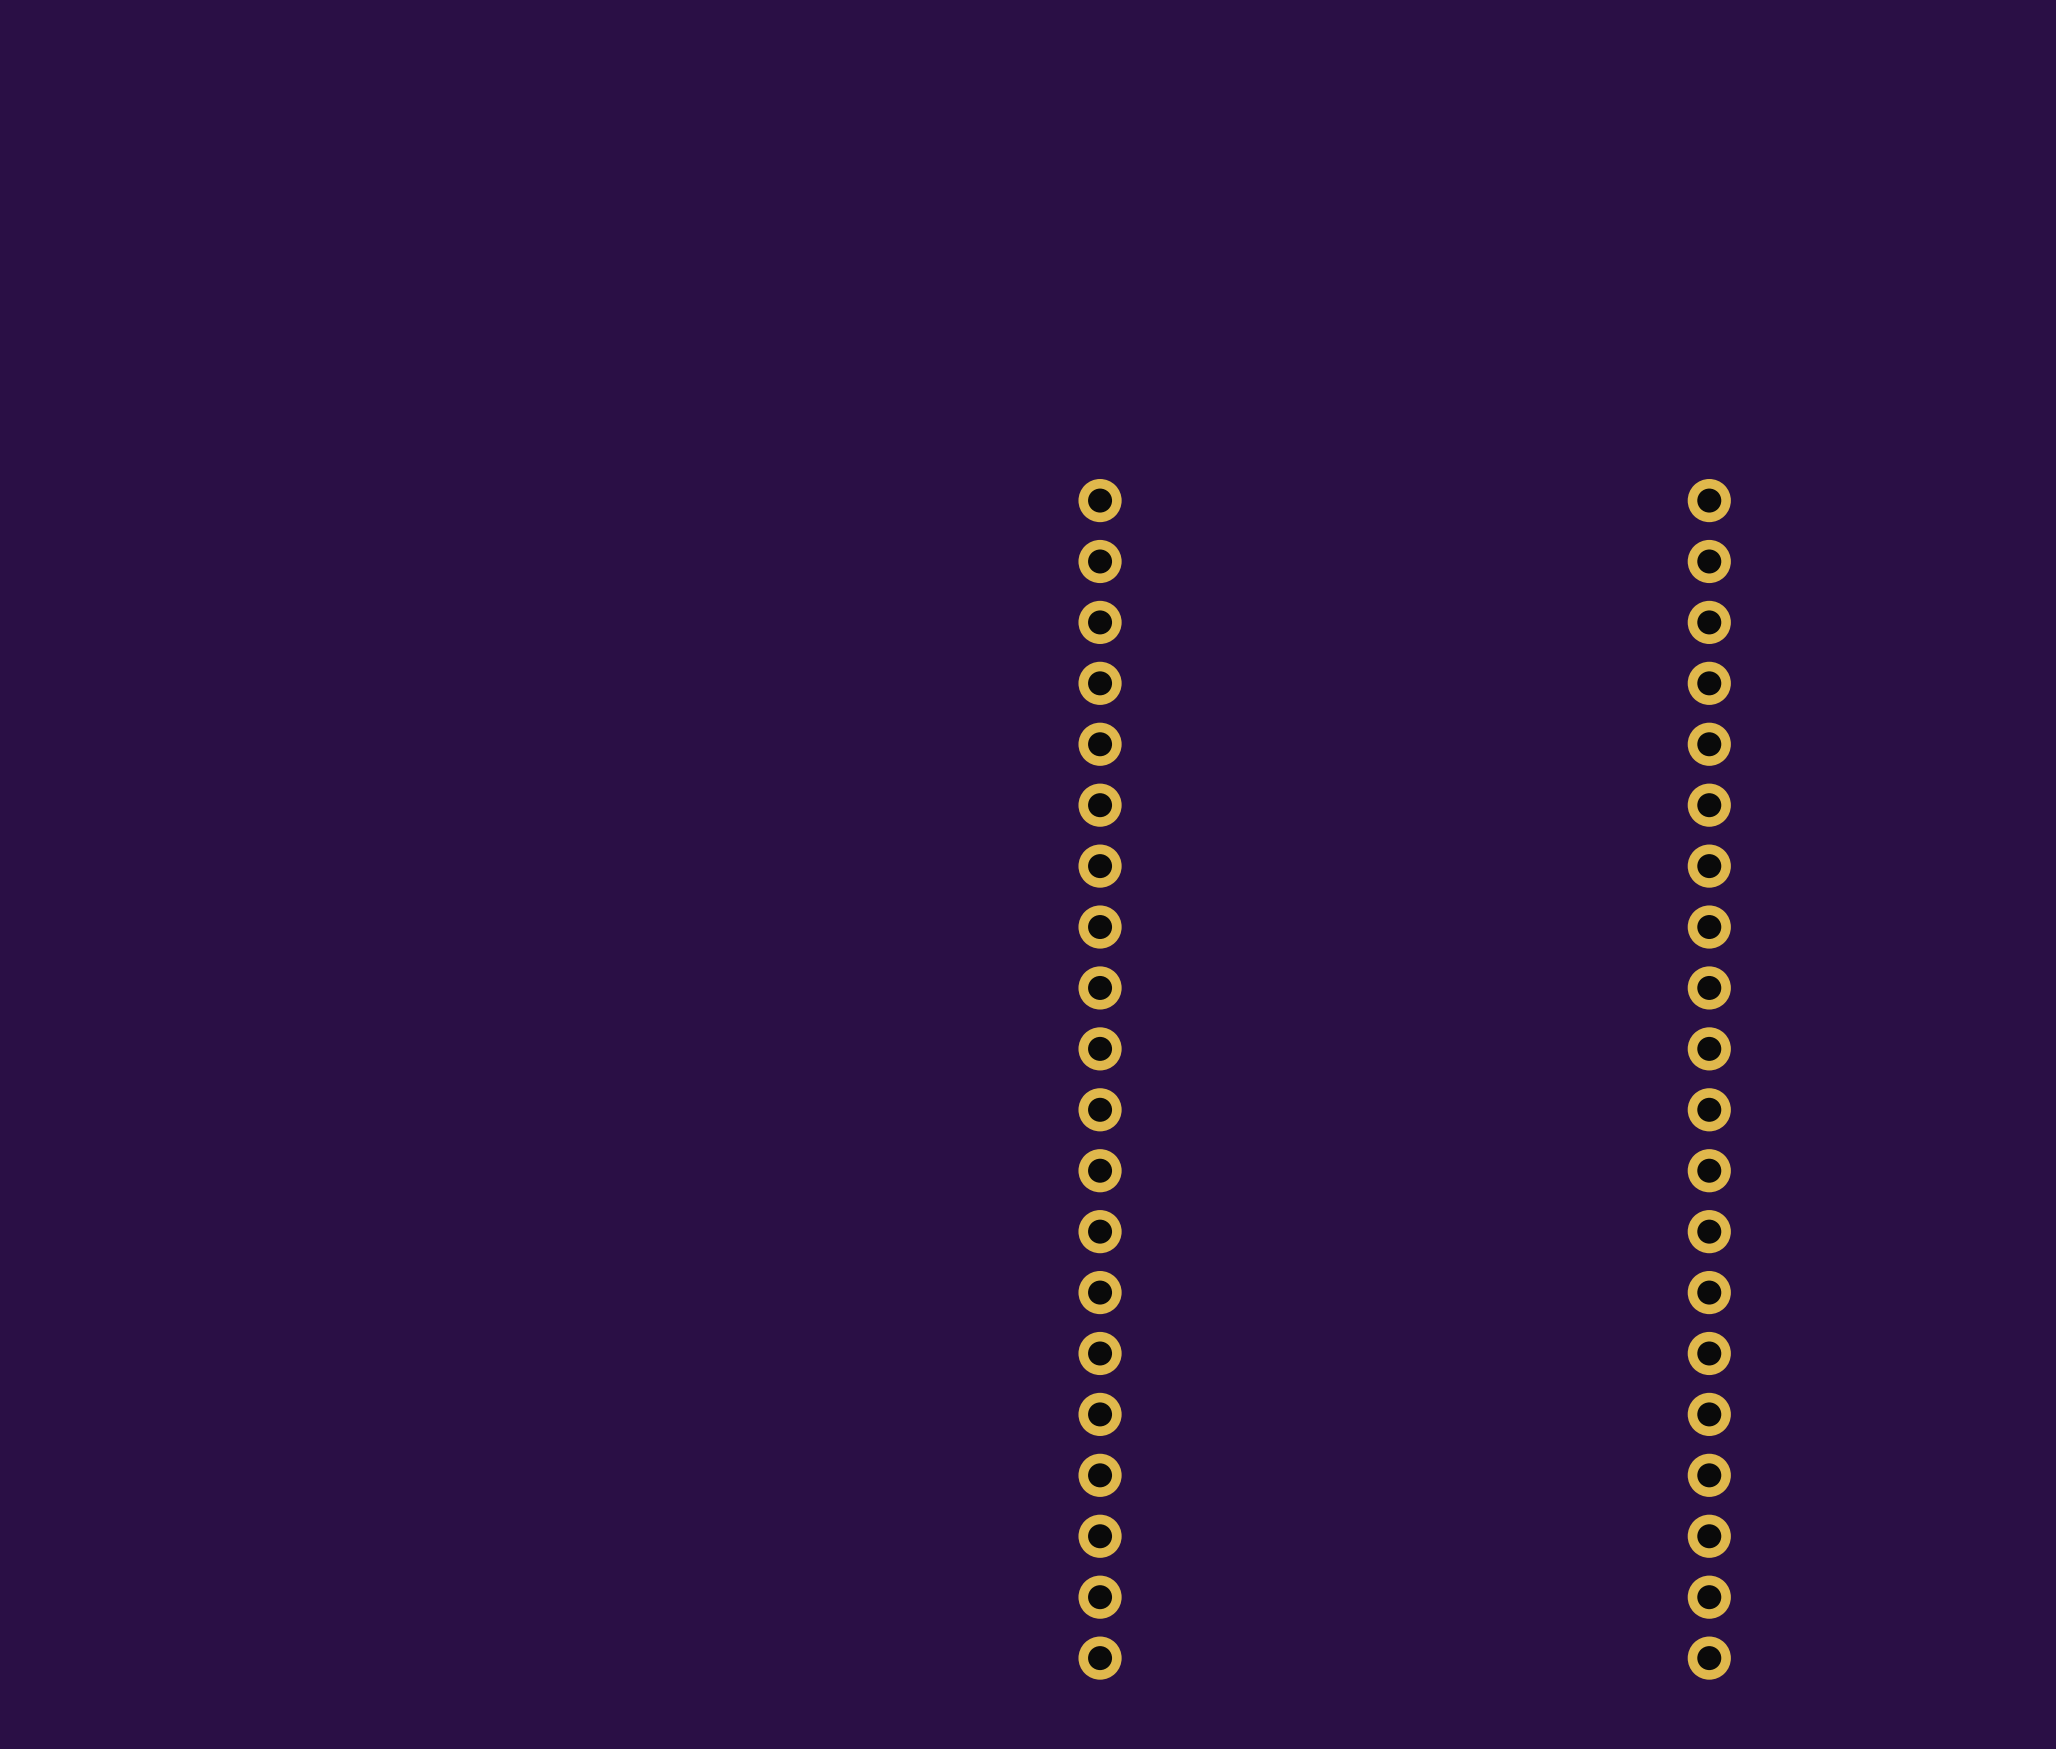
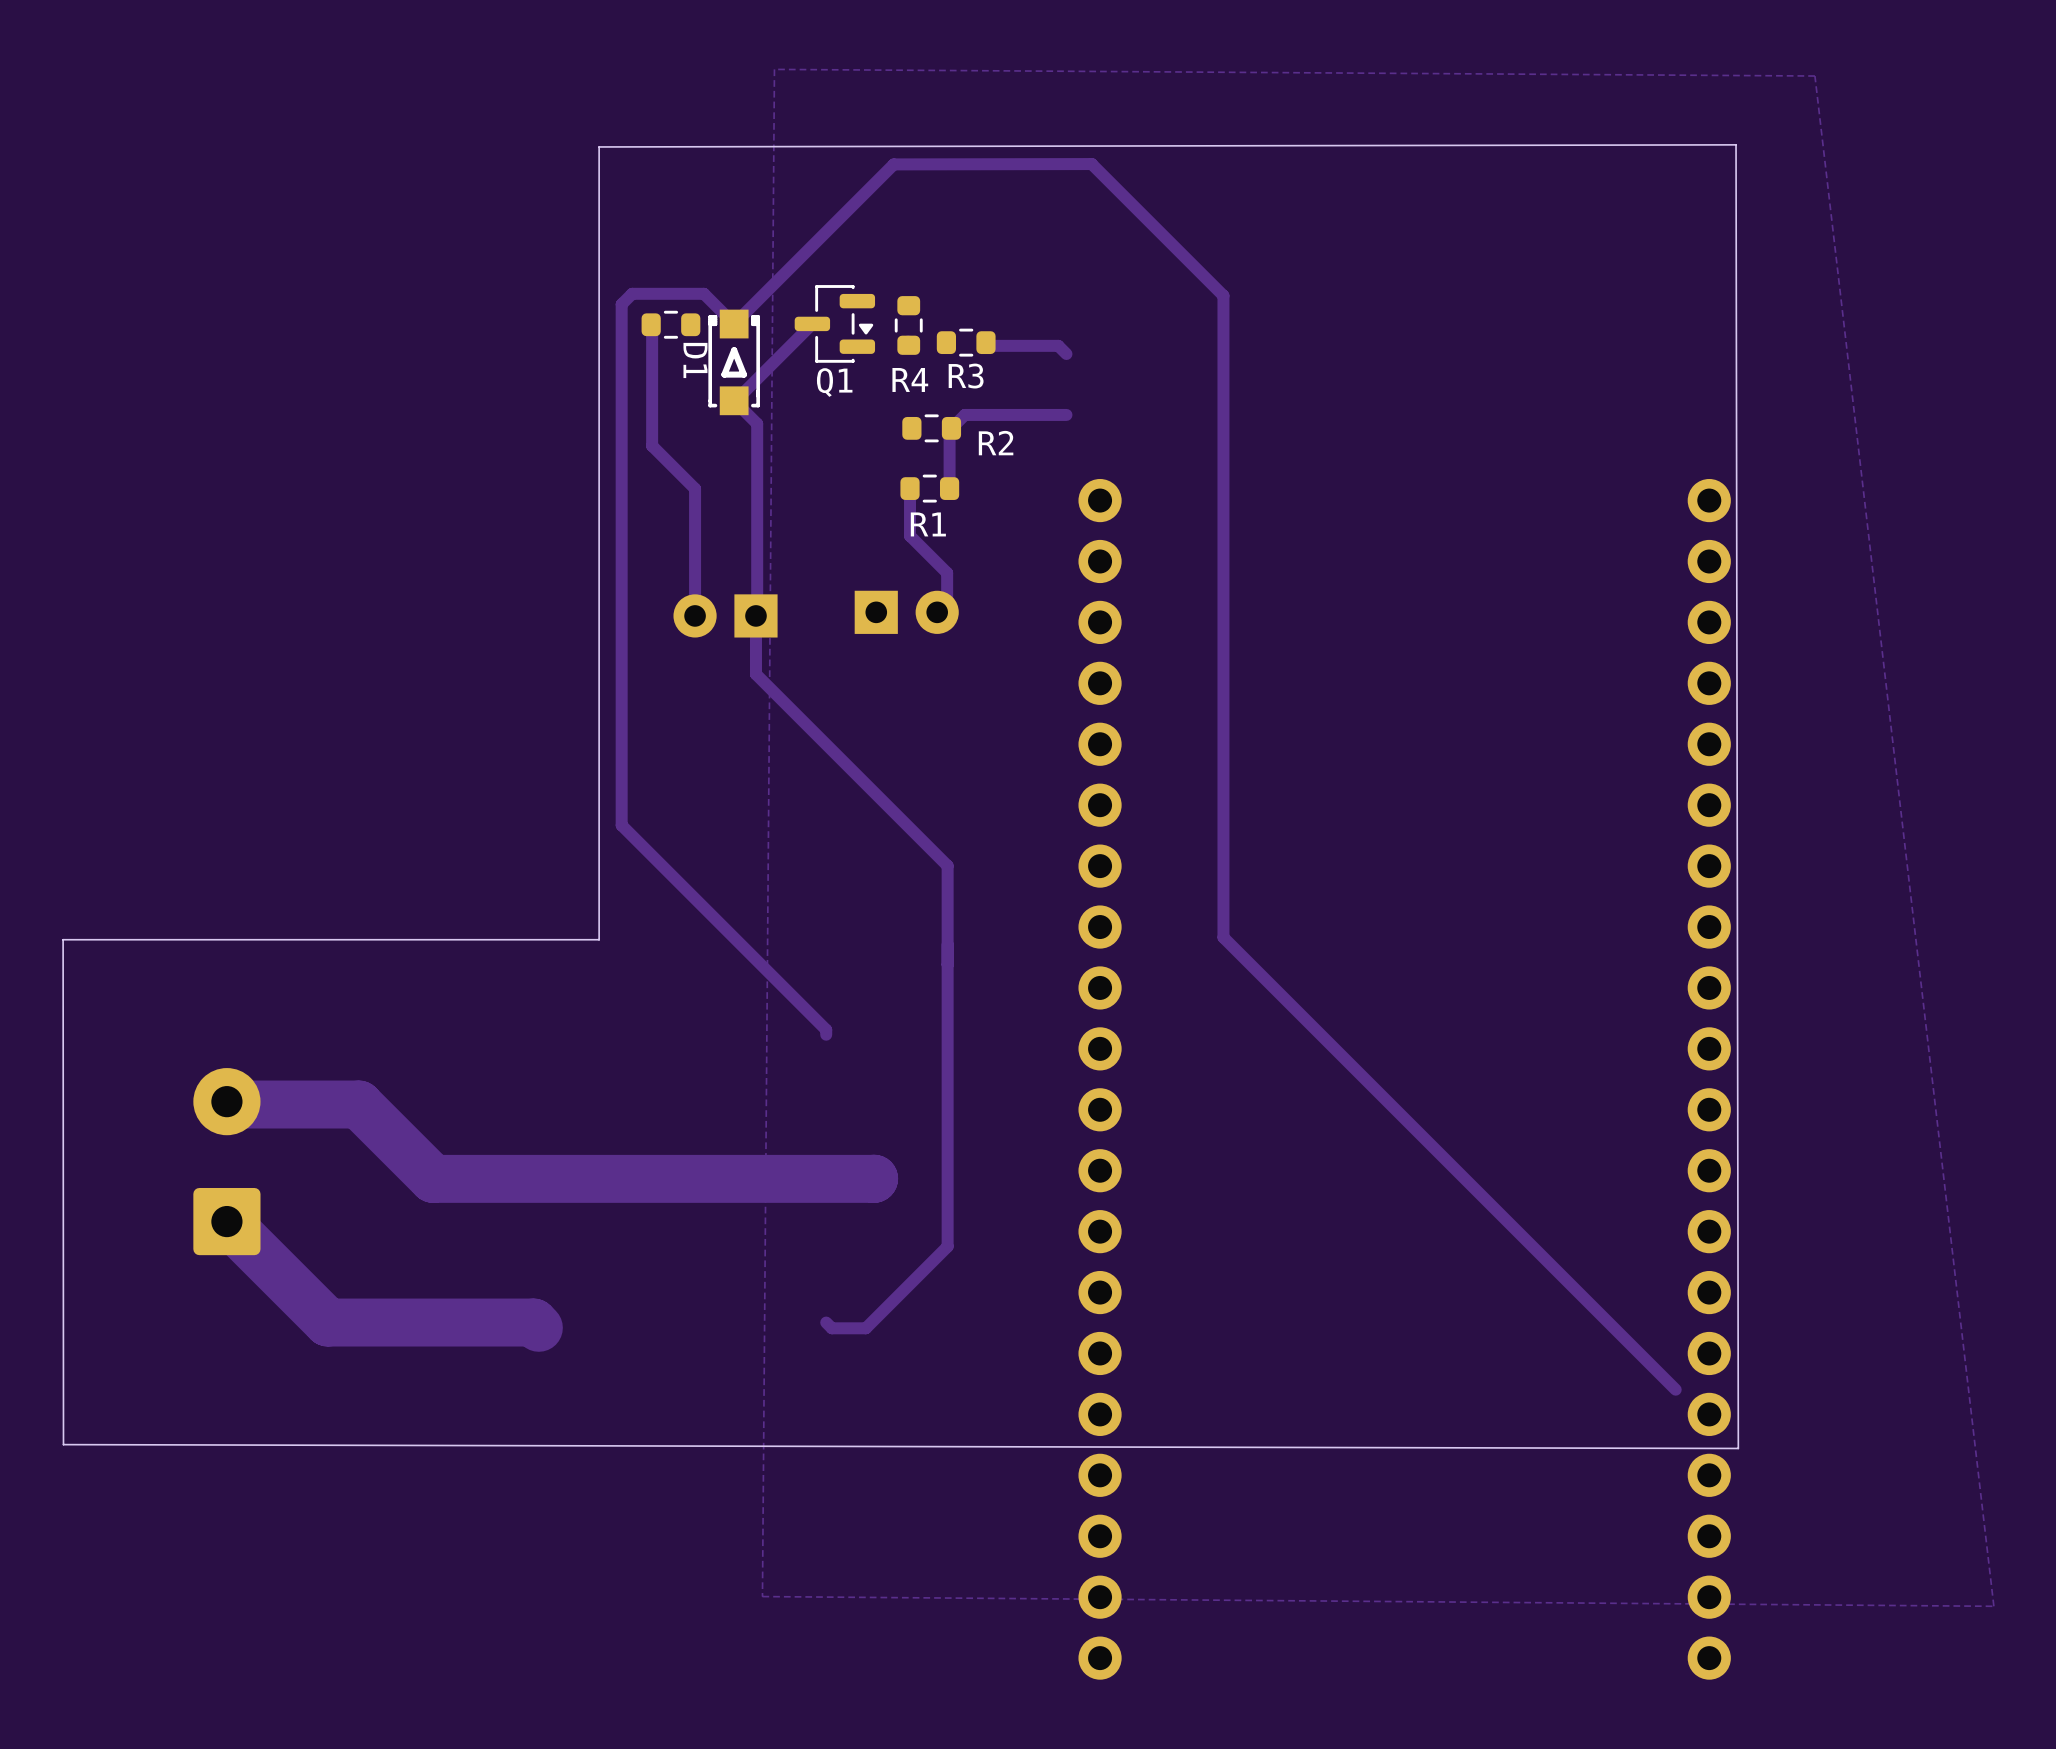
zone outline: none -> (774, 69) (1814, 76) (1993, 1606) (762, 1596) (774, 69)
board edge: none -> (1736, 144) (599, 146) (599, 939) (63, 939) (63, 1444) (1738, 1448) (1736, 144)
track: none -> (812, 323) (734, 400) (757, 423) (755, 674) (947, 865) (947, 1246) (865, 1328) (831, 1328) (826, 1322)
Q1: none -> (834, 323)
track: none -> (651, 324) (652, 445) (695, 488) (695, 615)
part: none -> (670, 324)
R4: none -> (908, 325)
R3: none -> (966, 342)
track: none -> (985, 342) (989, 345) (1058, 345) (1066, 354)
D1: none -> (734, 362)
track: none -> (1066, 414) (964, 414) (949, 430) (949, 487)
R2: none -> (931, 428)
track: none -> (910, 487) (910, 535) (947, 573) (947, 602) (937, 612)
R1: none -> (929, 488)
part: none -> (906, 612)
part: none -> (725, 615)
track: none -> (826, 1034) (826, 1029) (621, 825) (621, 304) (632, 293) (703, 293) (734, 324) (893, 164) (1091, 164) (1223, 295) (1223, 937) (1675, 1389)
track: none -> (226, 1101) (229, 1104) (358, 1104) (433, 1178) (873, 1178)
part: none -> (226, 1161)
track: none -> (226, 1221) (327, 1322) (533, 1322) (538, 1327)

